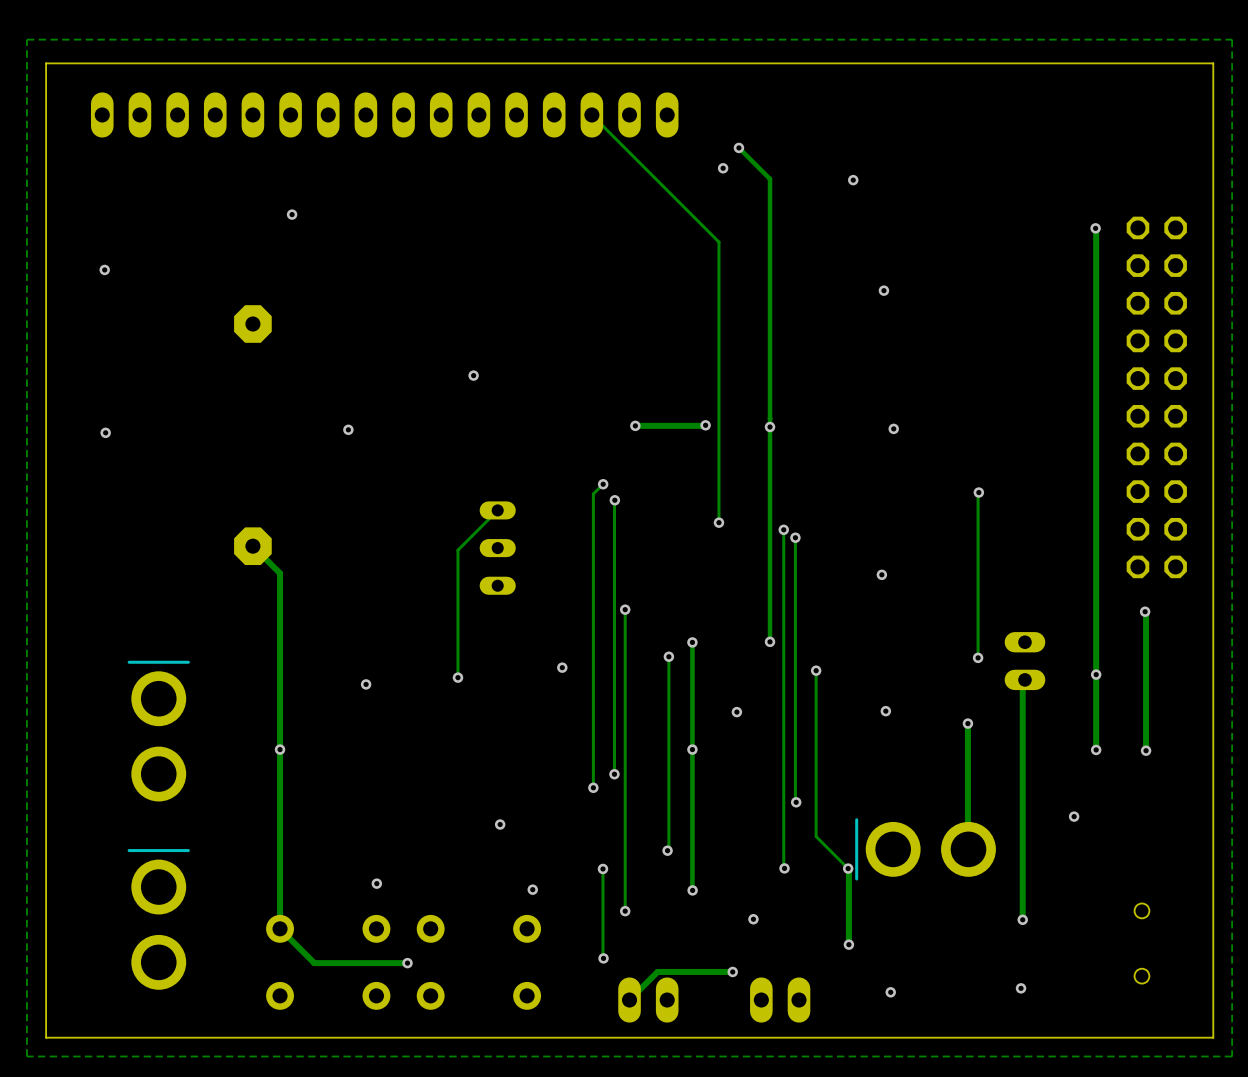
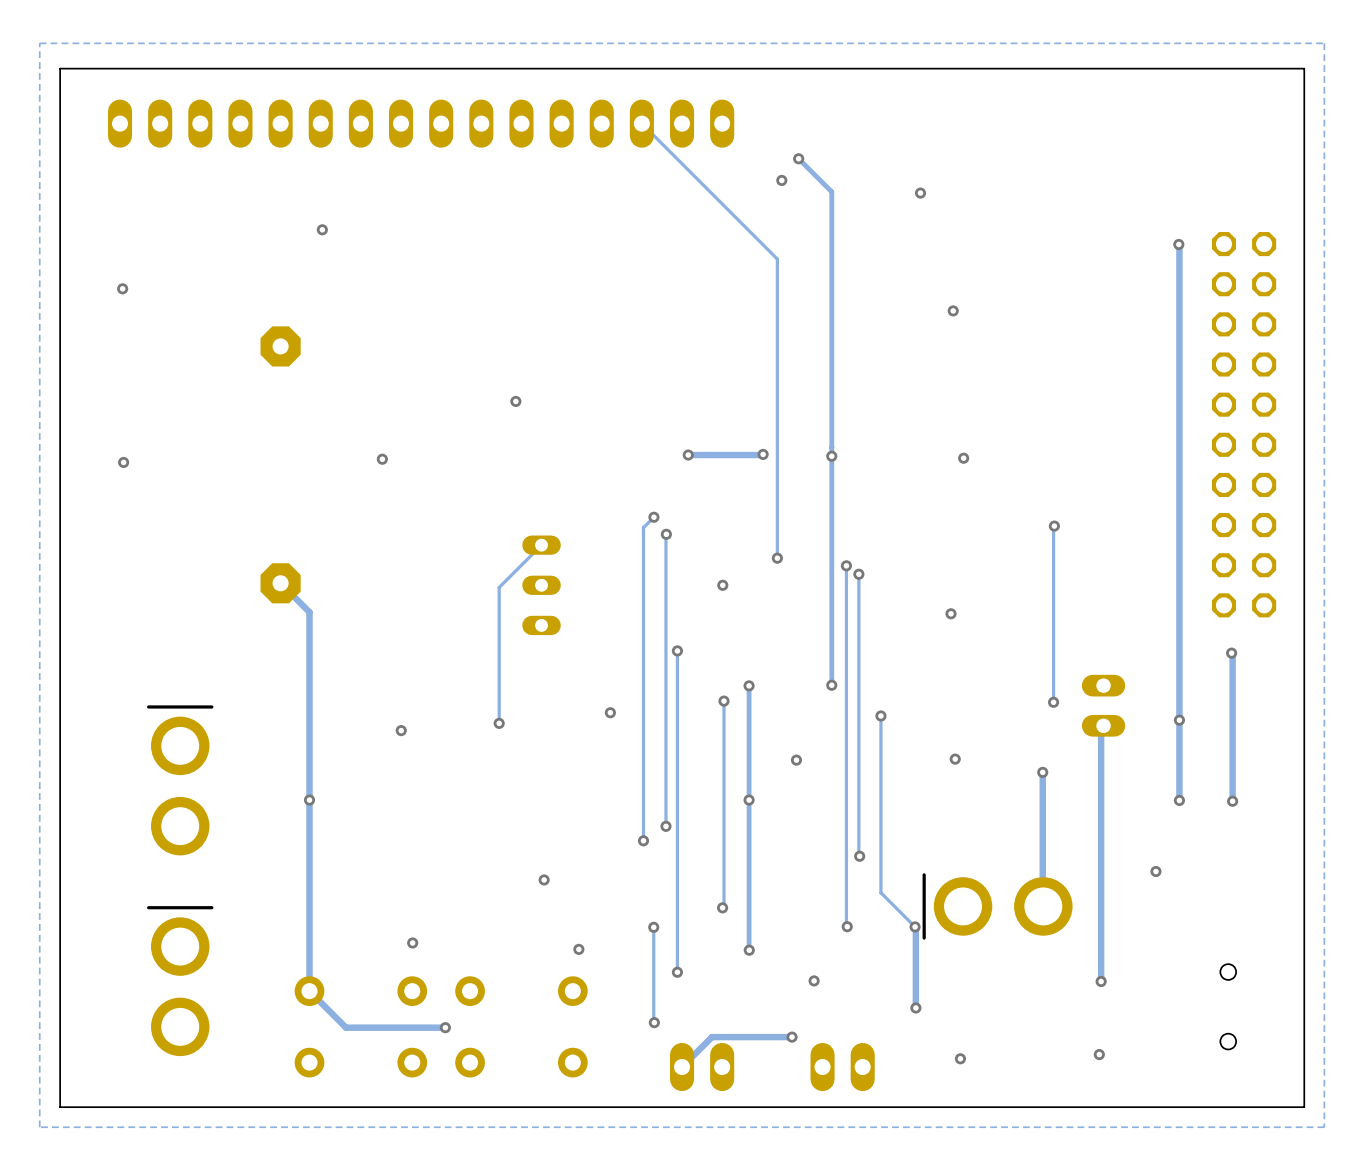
via: none -> (722, 585)

